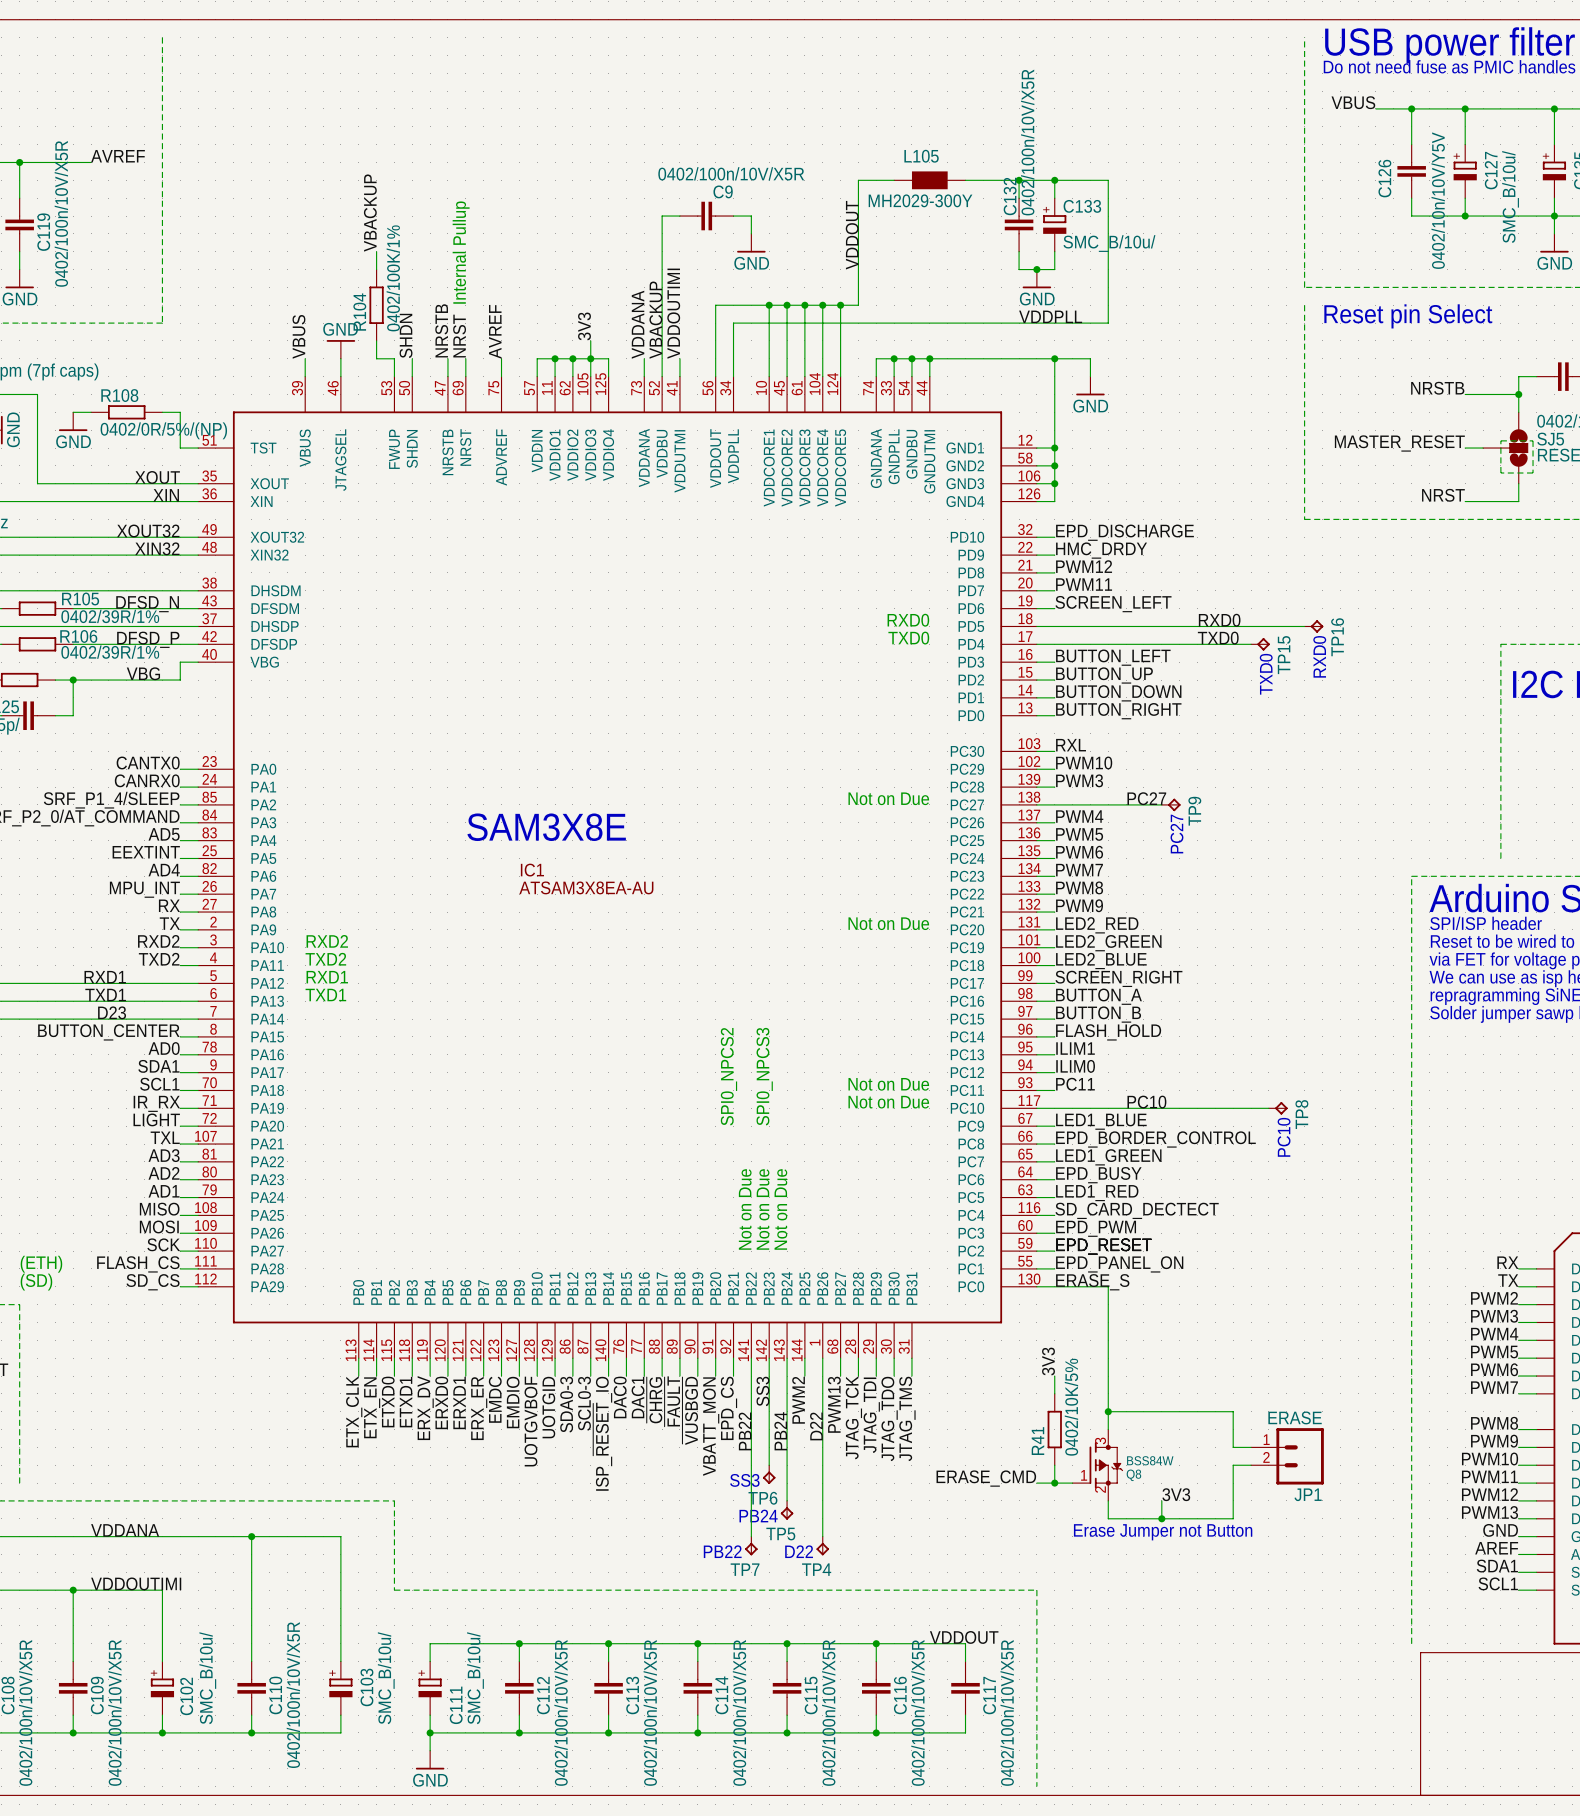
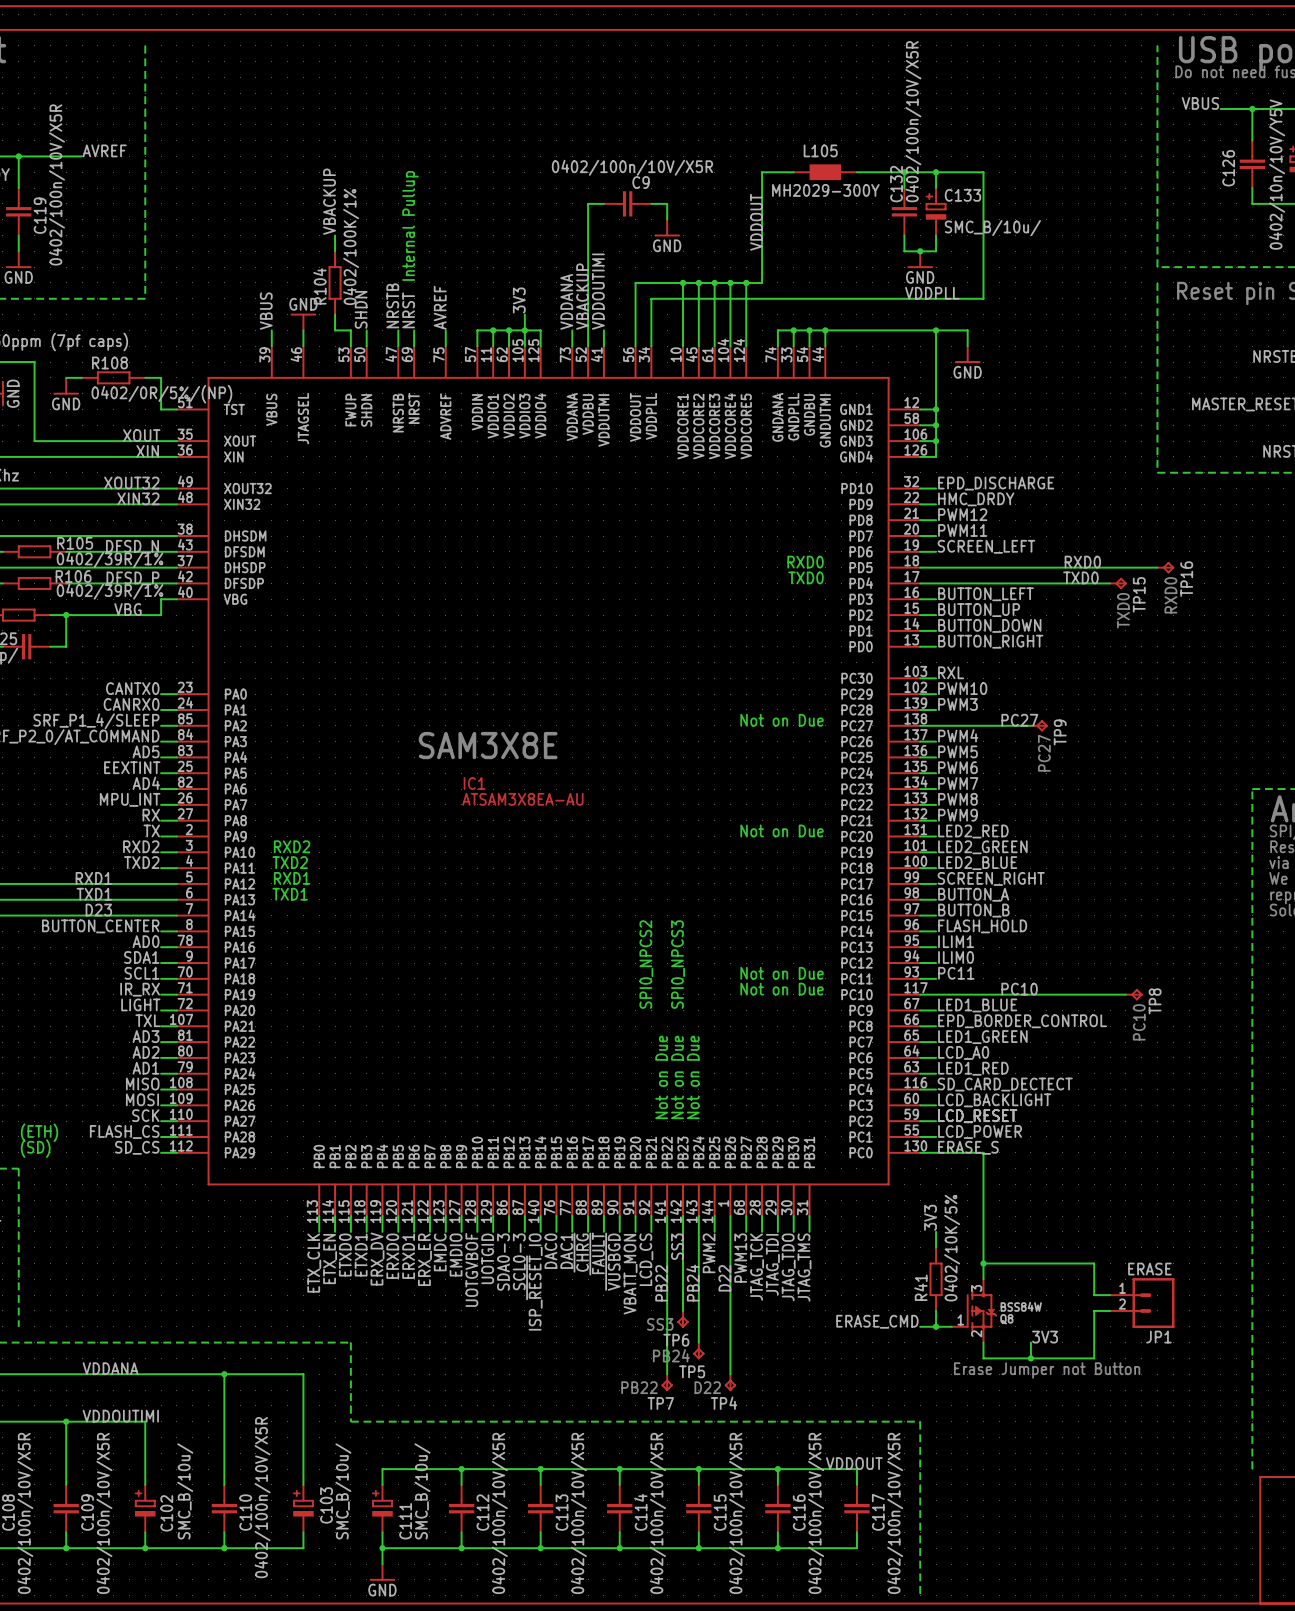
label: EPD_BUSY (1098, 1175) -> LCD_A0 (963, 1052)
label: EPD_PWM (1096, 1228) -> LCD_BACKLIGHT (994, 1100)
label: EPD_RESET (1103, 1246) -> LCD_RESET (977, 1116)
label: EPD_PANEL_ON (1119, 1264) -> LCD_POWER (980, 1131)
label: EPD_CS (728, 1408) -> LCD_CS (646, 1259)

